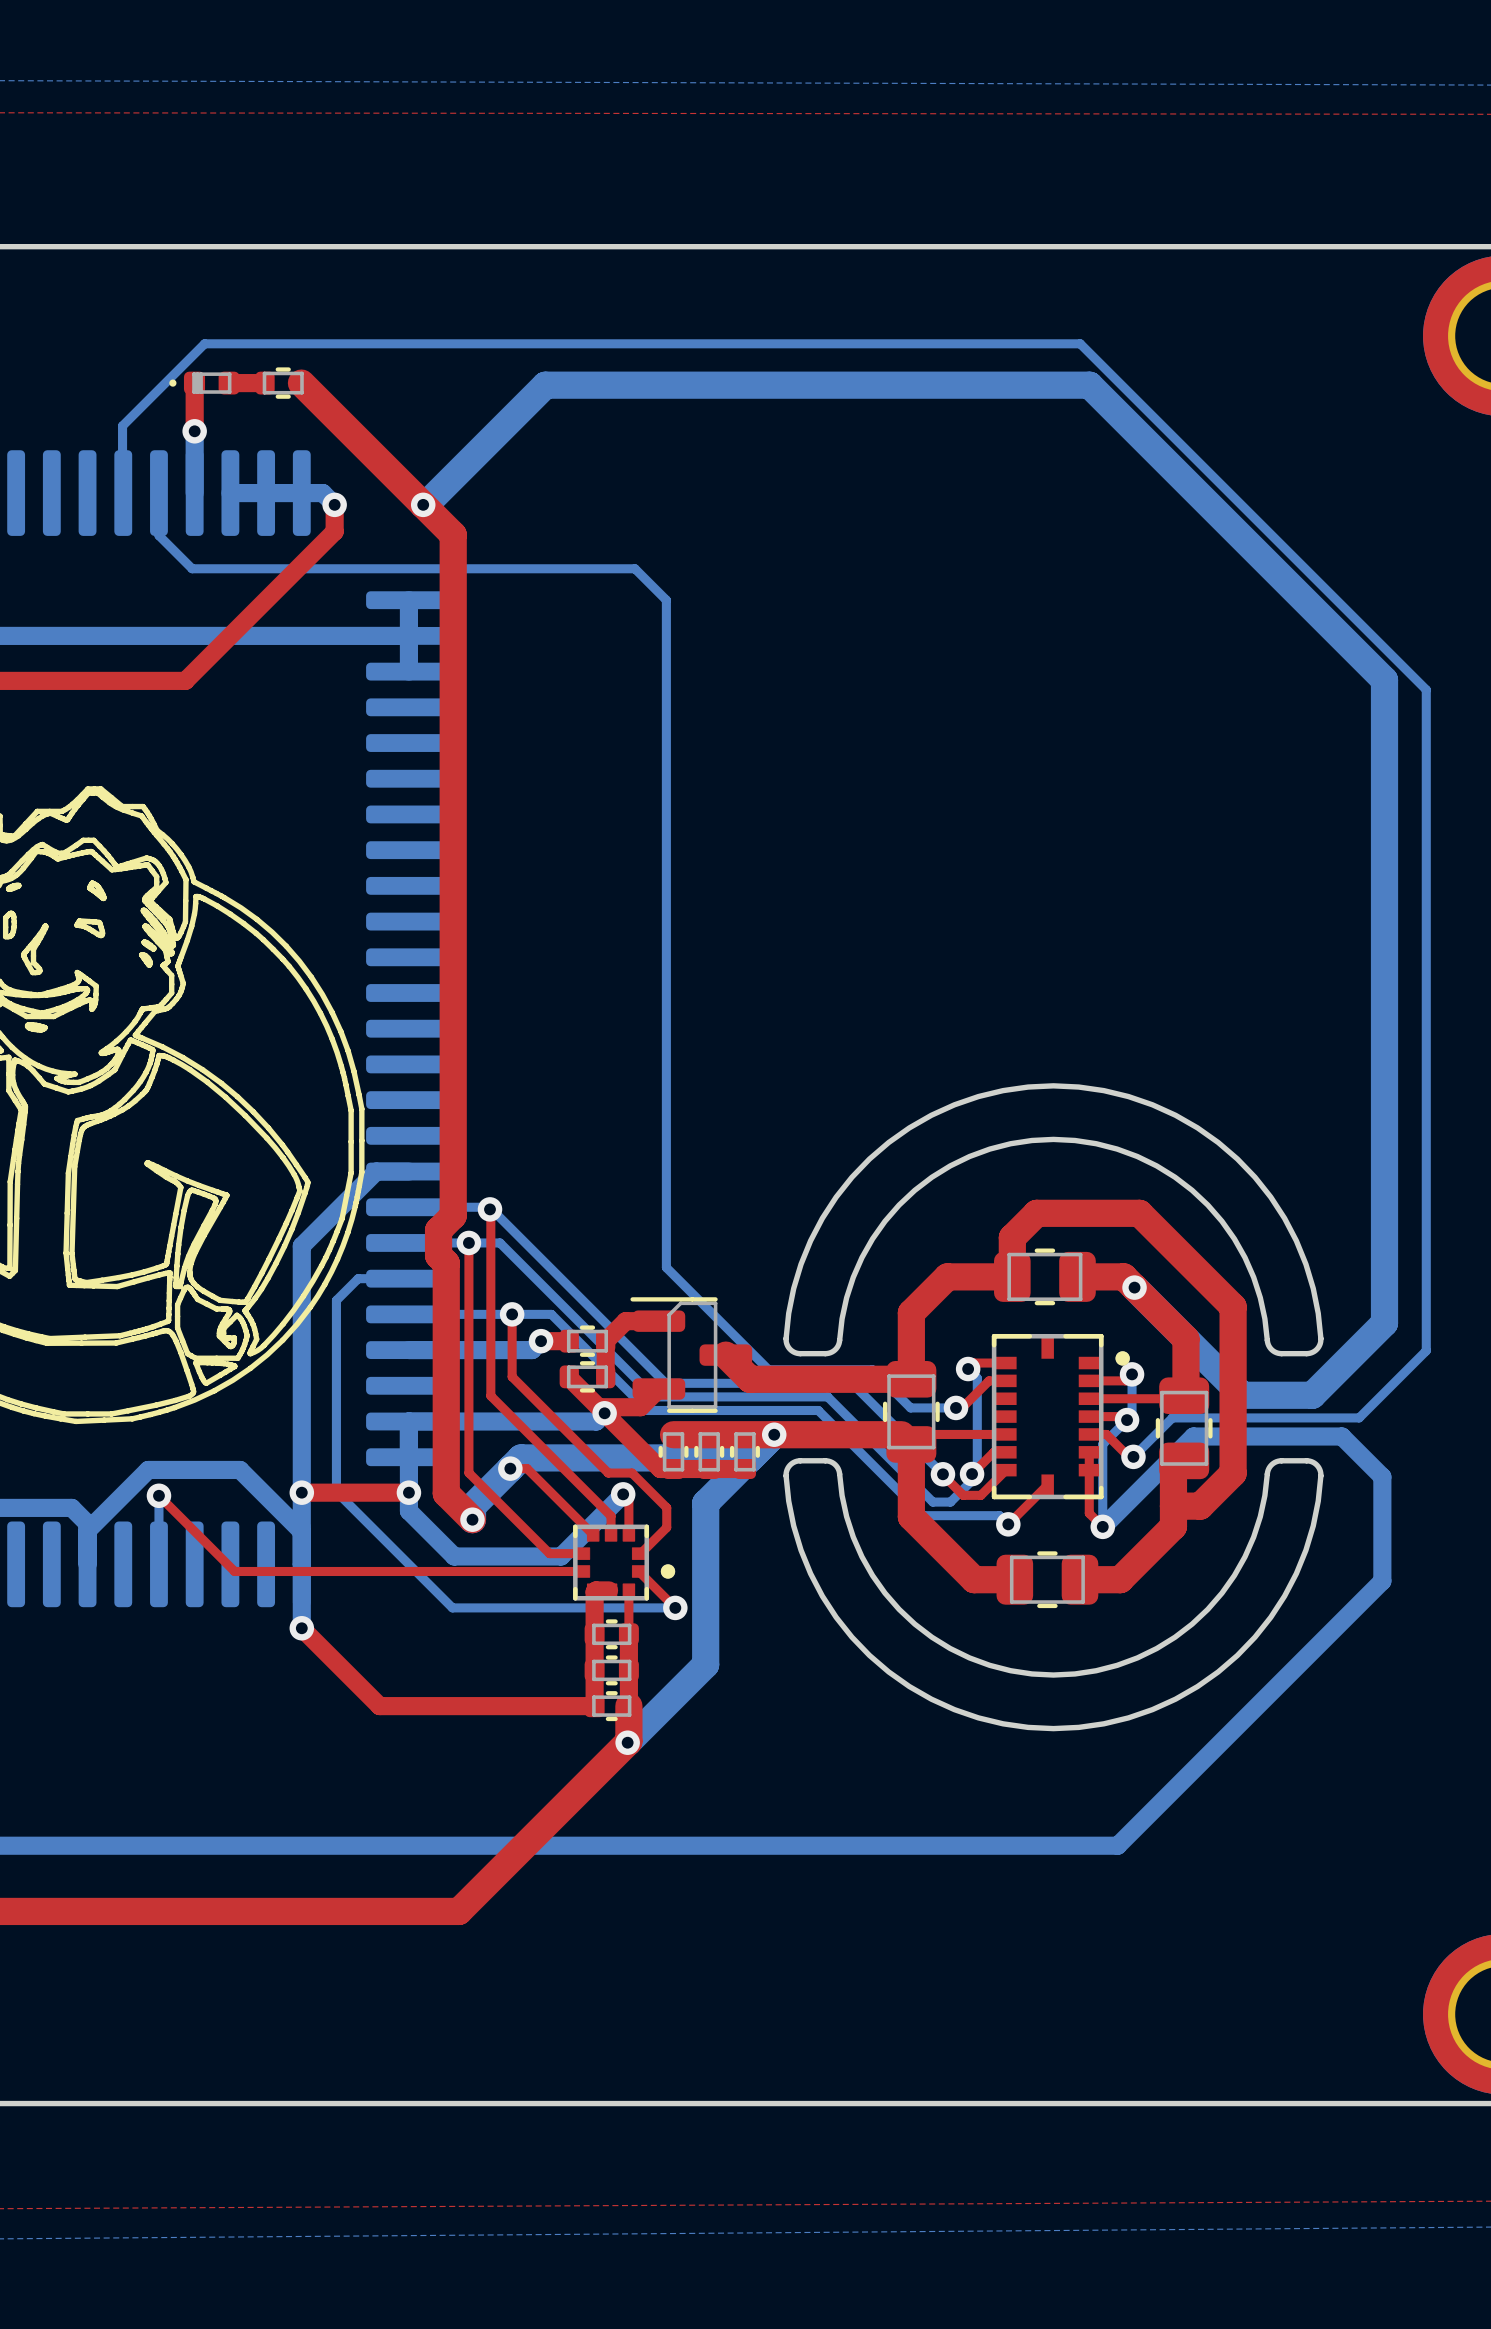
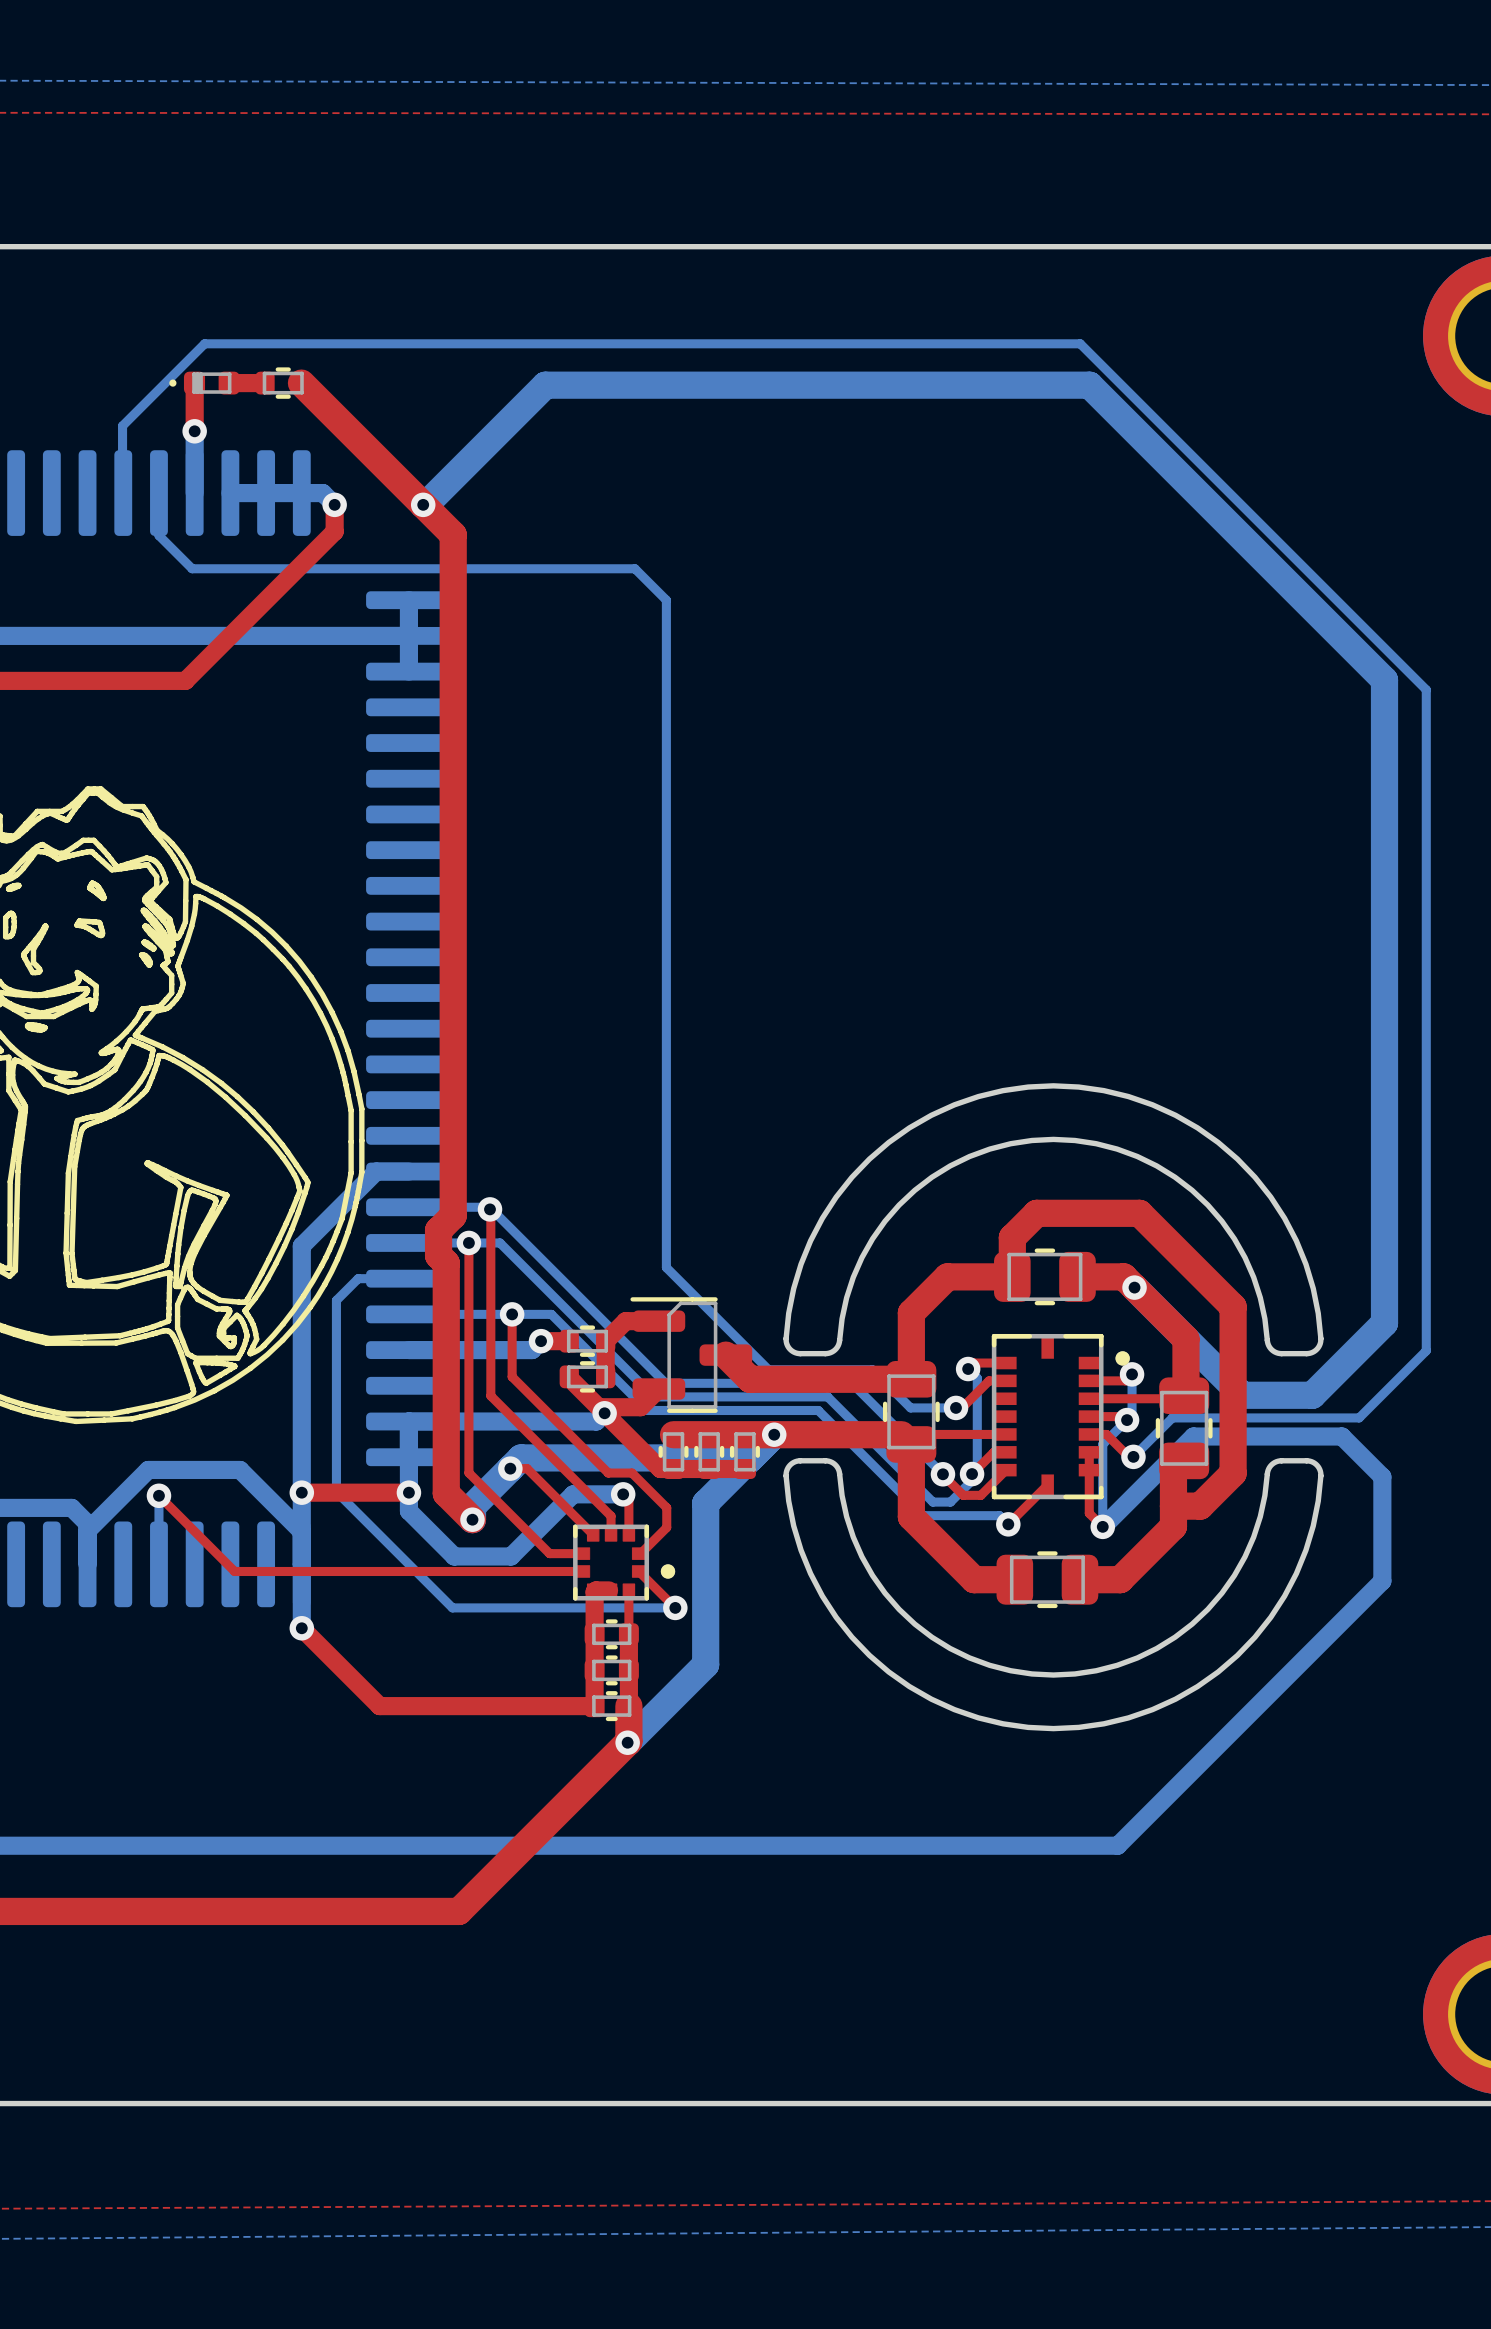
bottom track: (623, 1494) (561, 1556) (511, 1556) -> (623, 1494) (573, 1494) (511, 1556)

